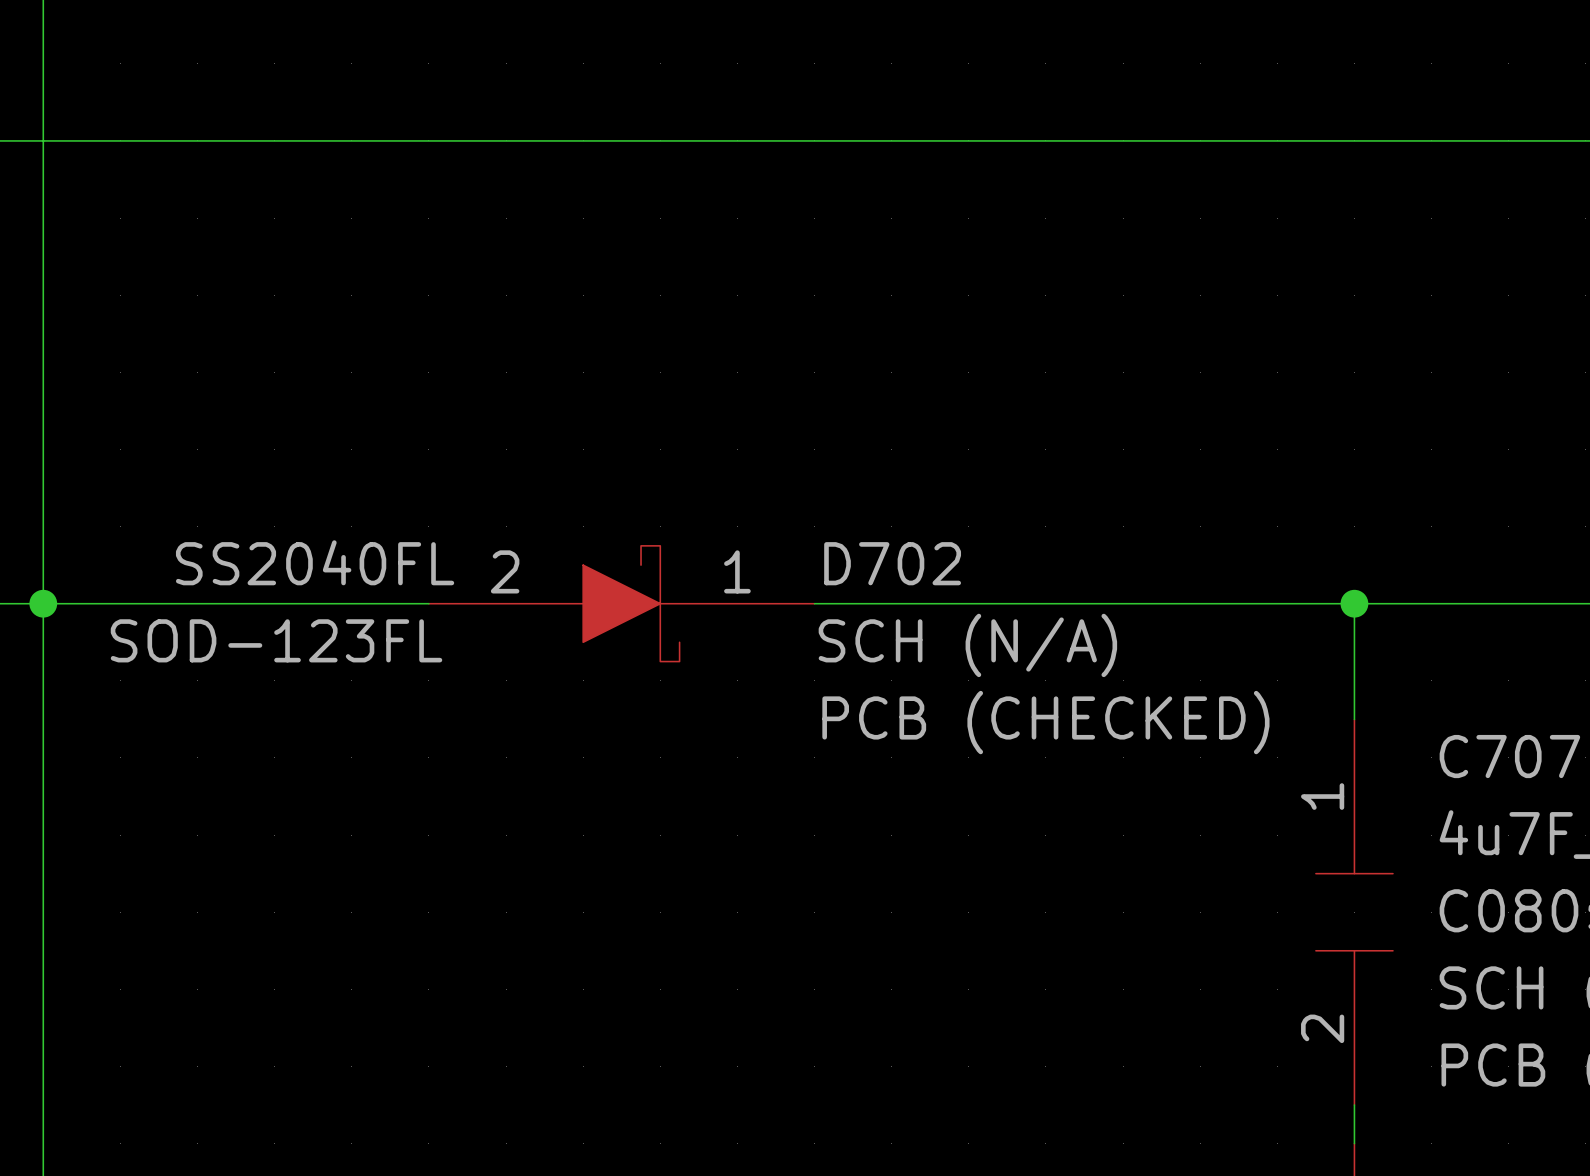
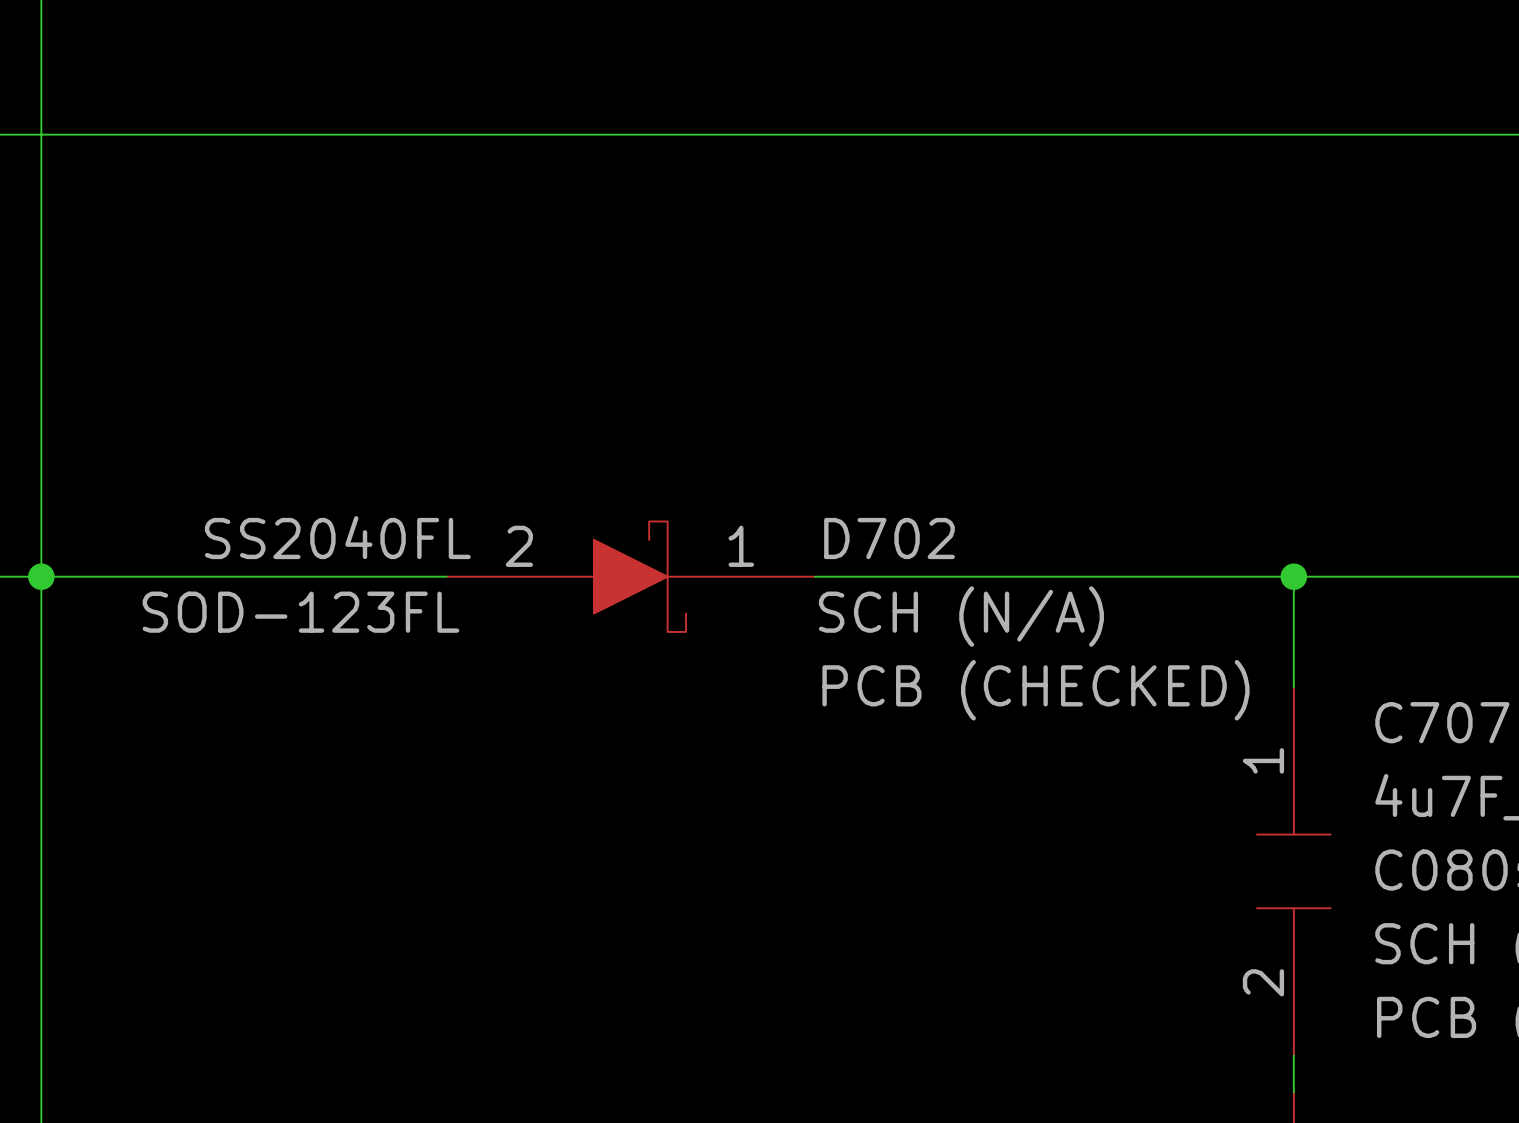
D702 position: (621, 603) -> (630, 576)

